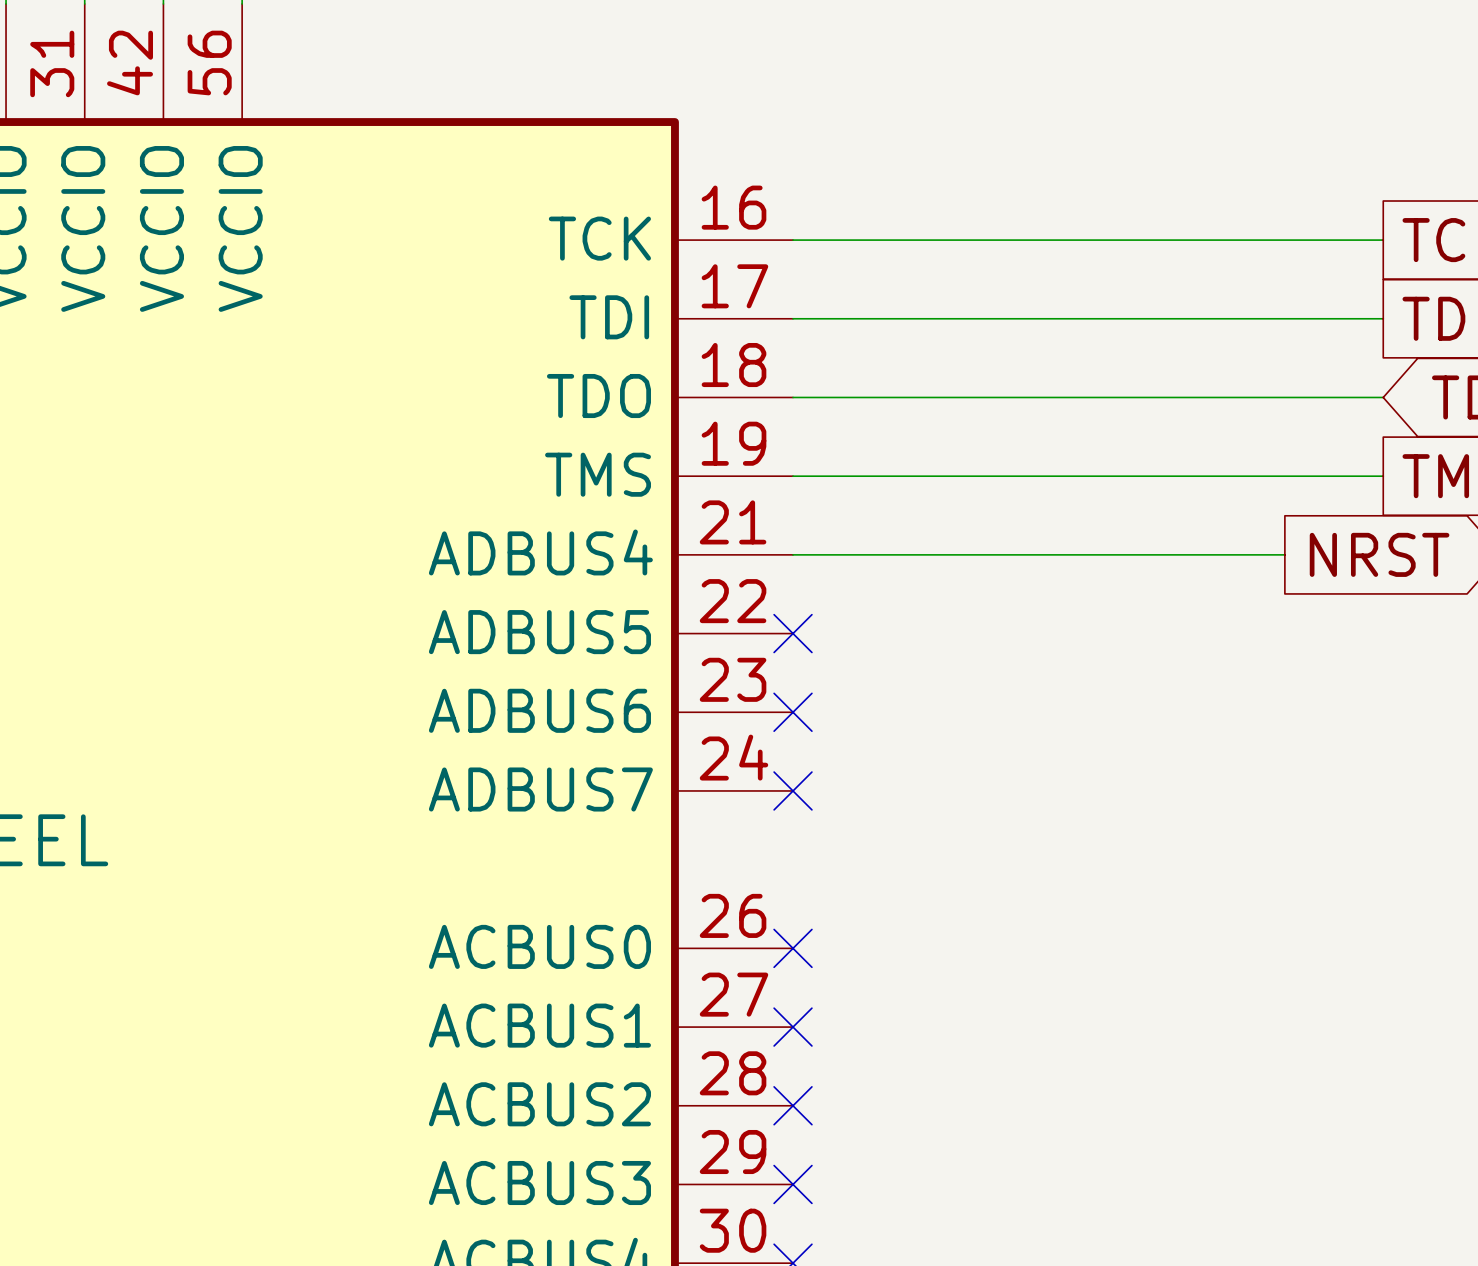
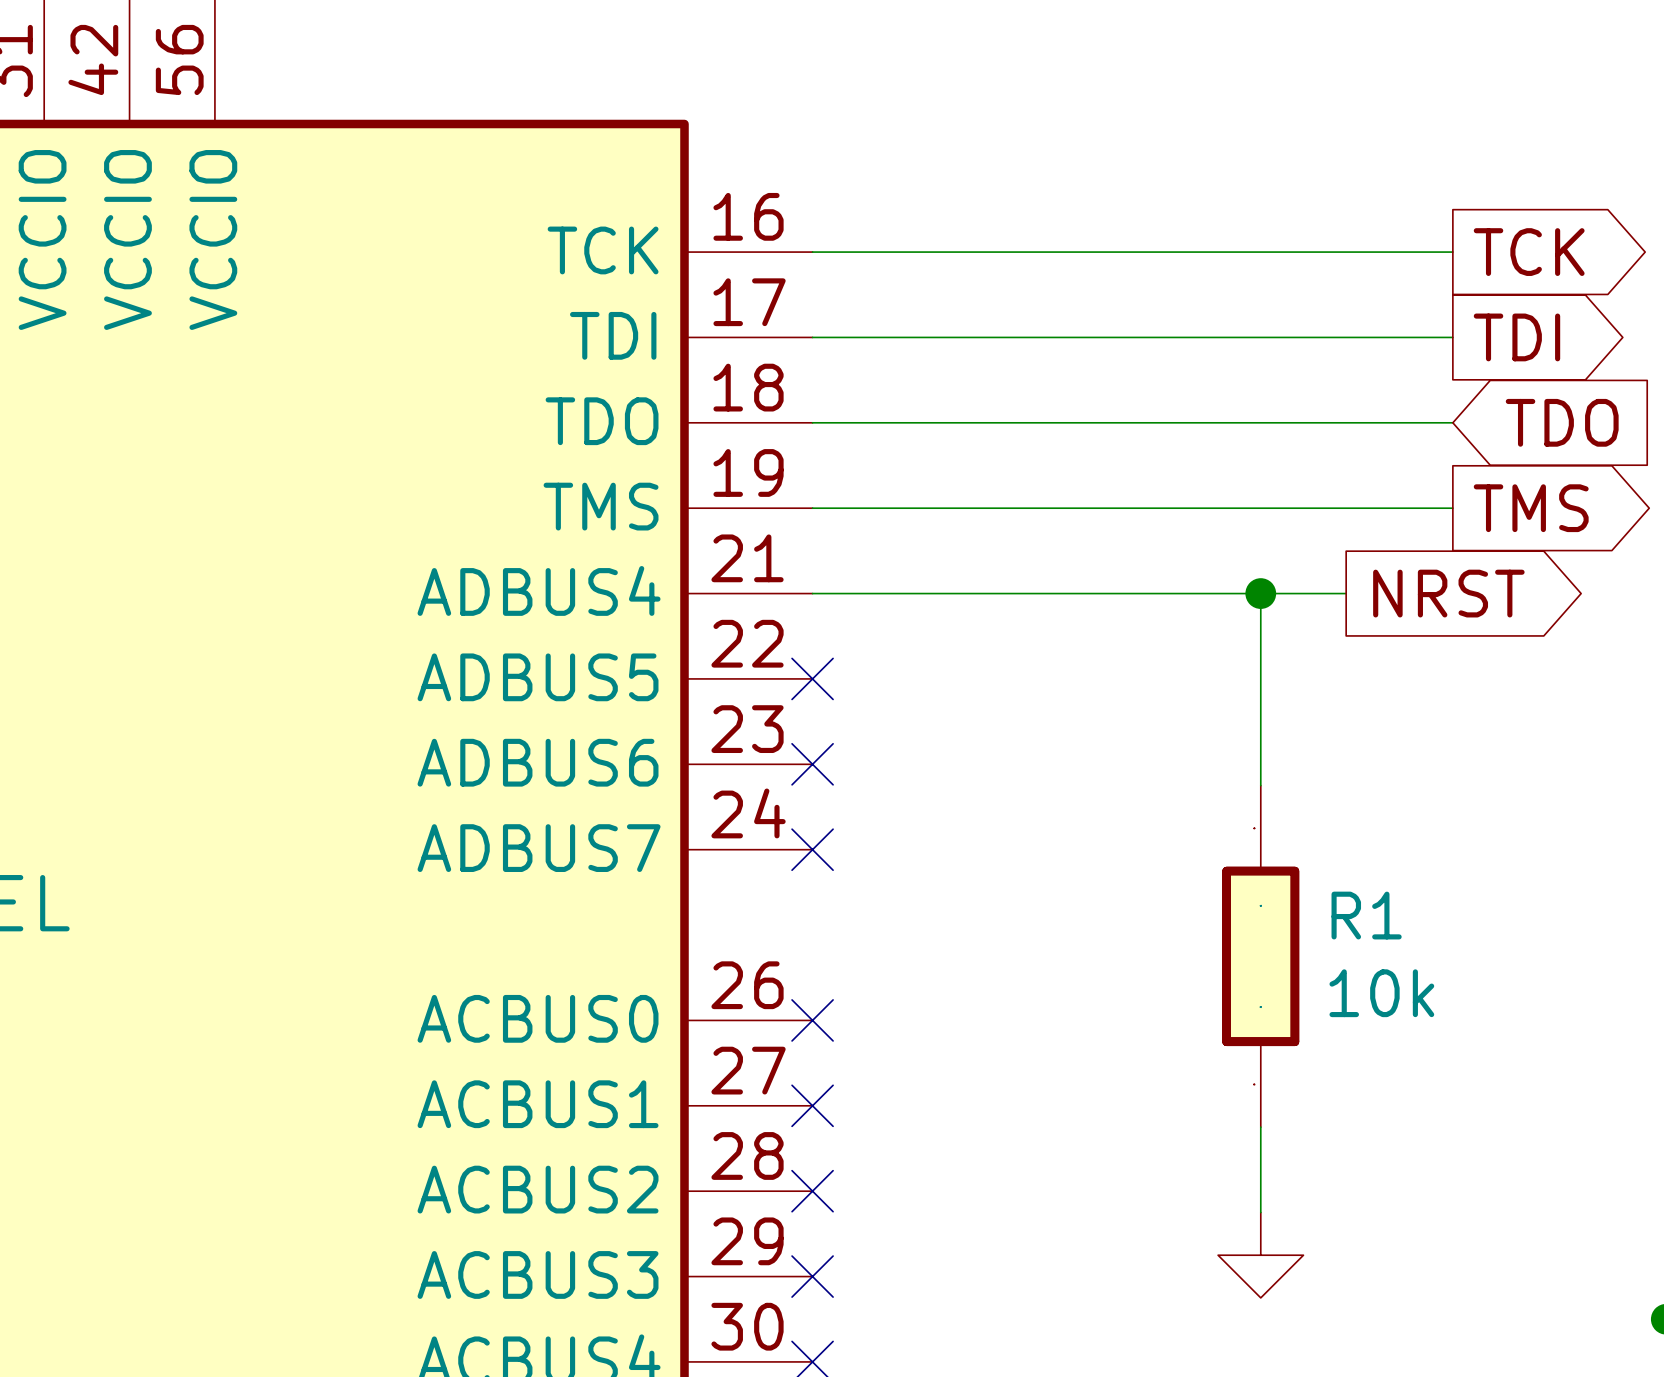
wire: none -> (1260, 593) (1260, 785)
junction: none -> (1260, 593)
R1: none -> (1260, 956)
wire: none -> (1260, 1127) (1260, 1212)
power symbol: none -> (1260, 1255)

